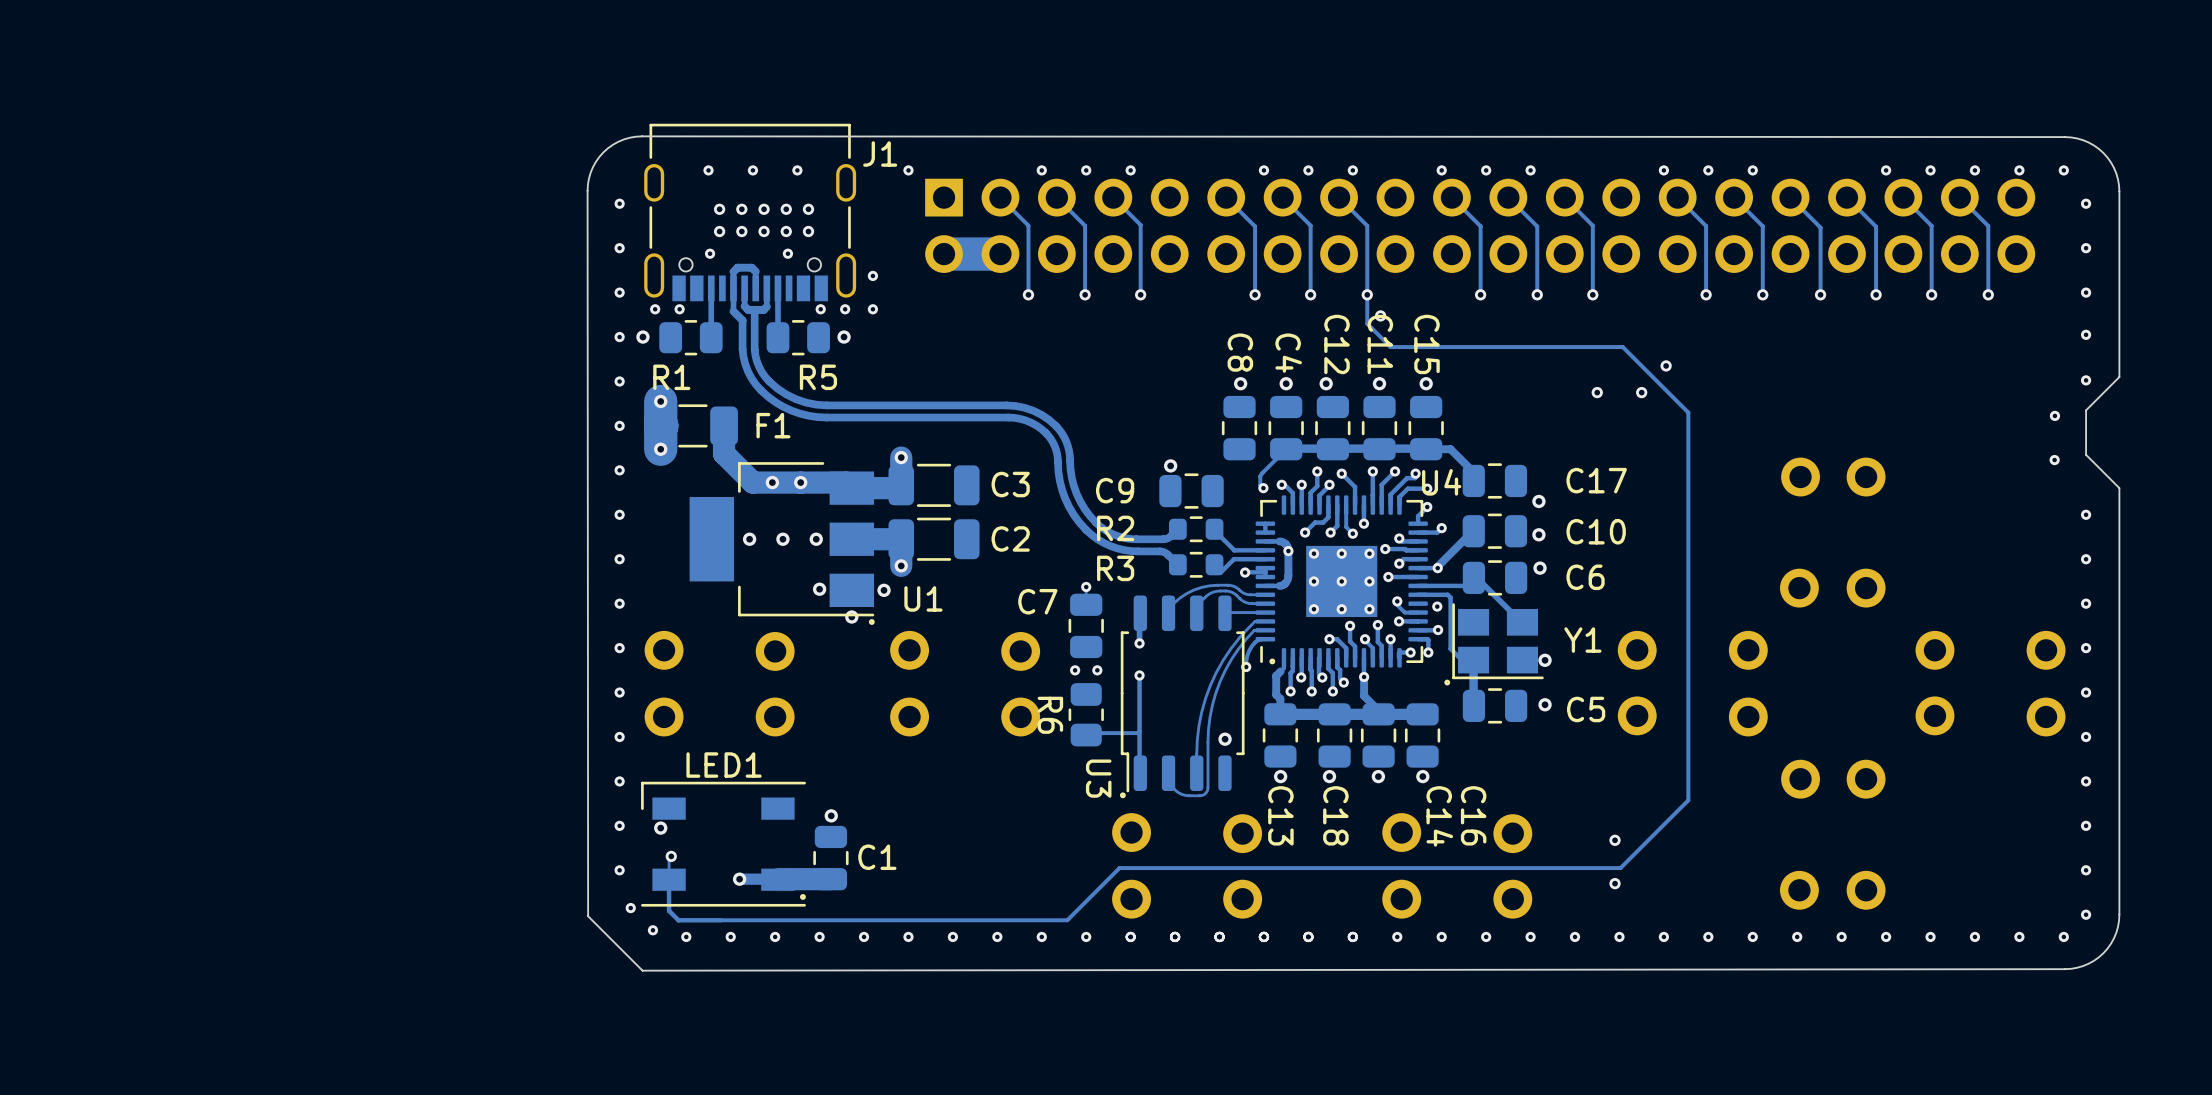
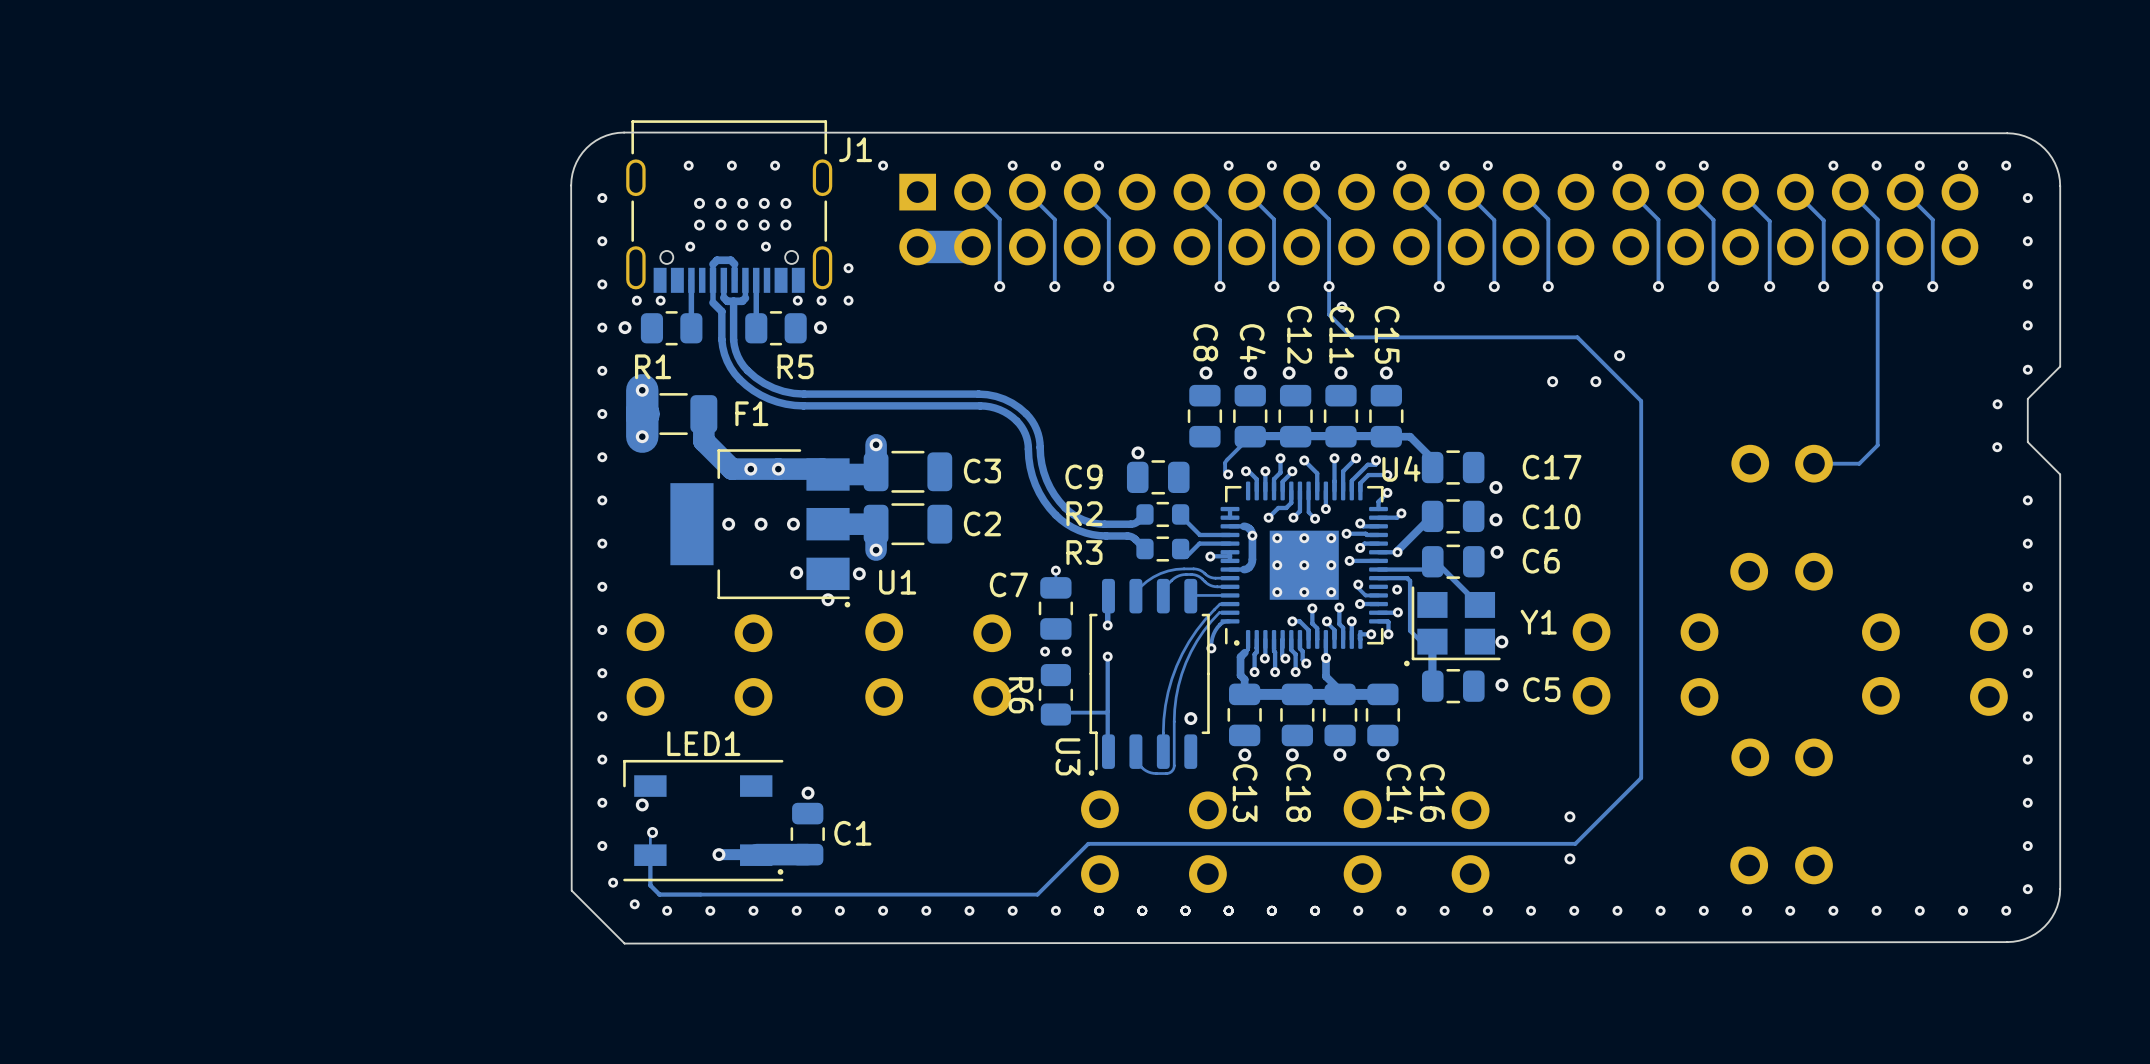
track: none -> (1877, 286) (1877, 445) (1859, 463) (1813, 463)

